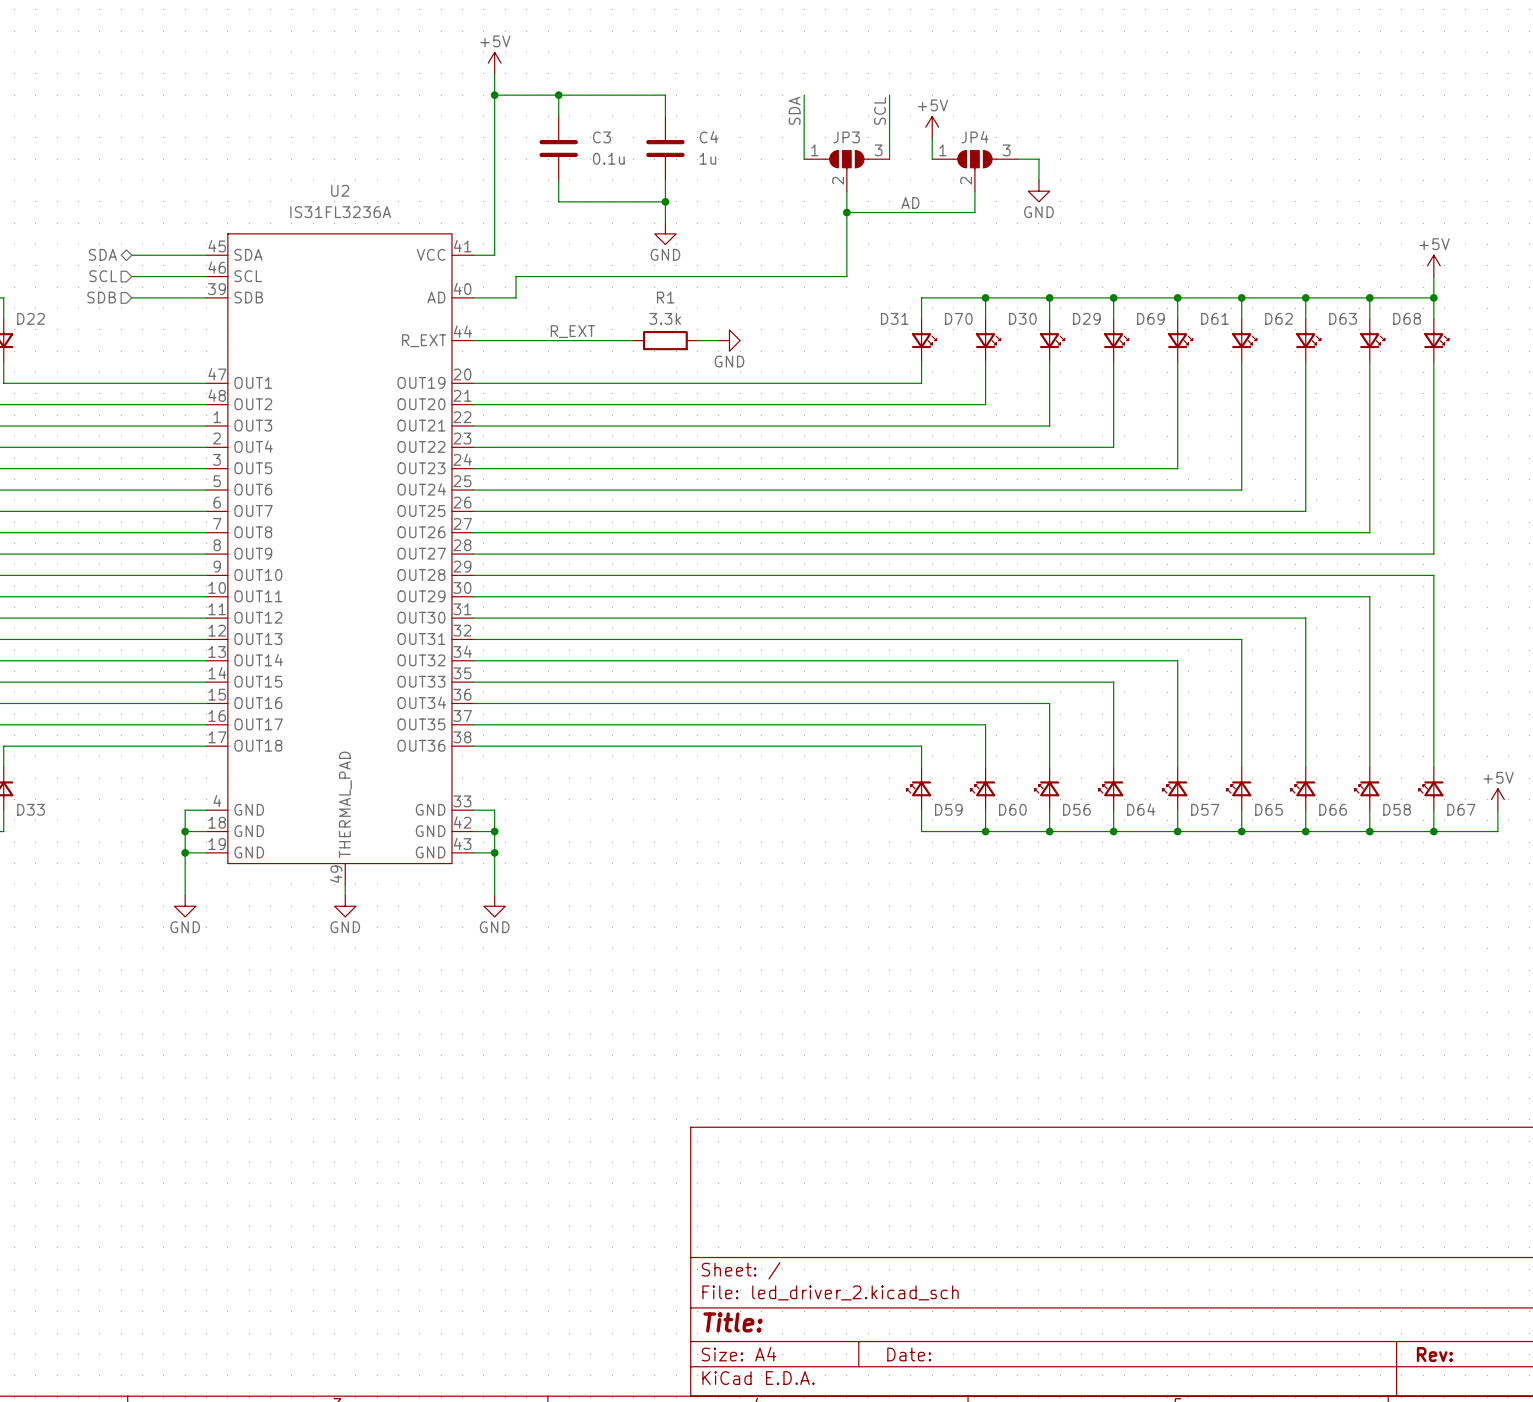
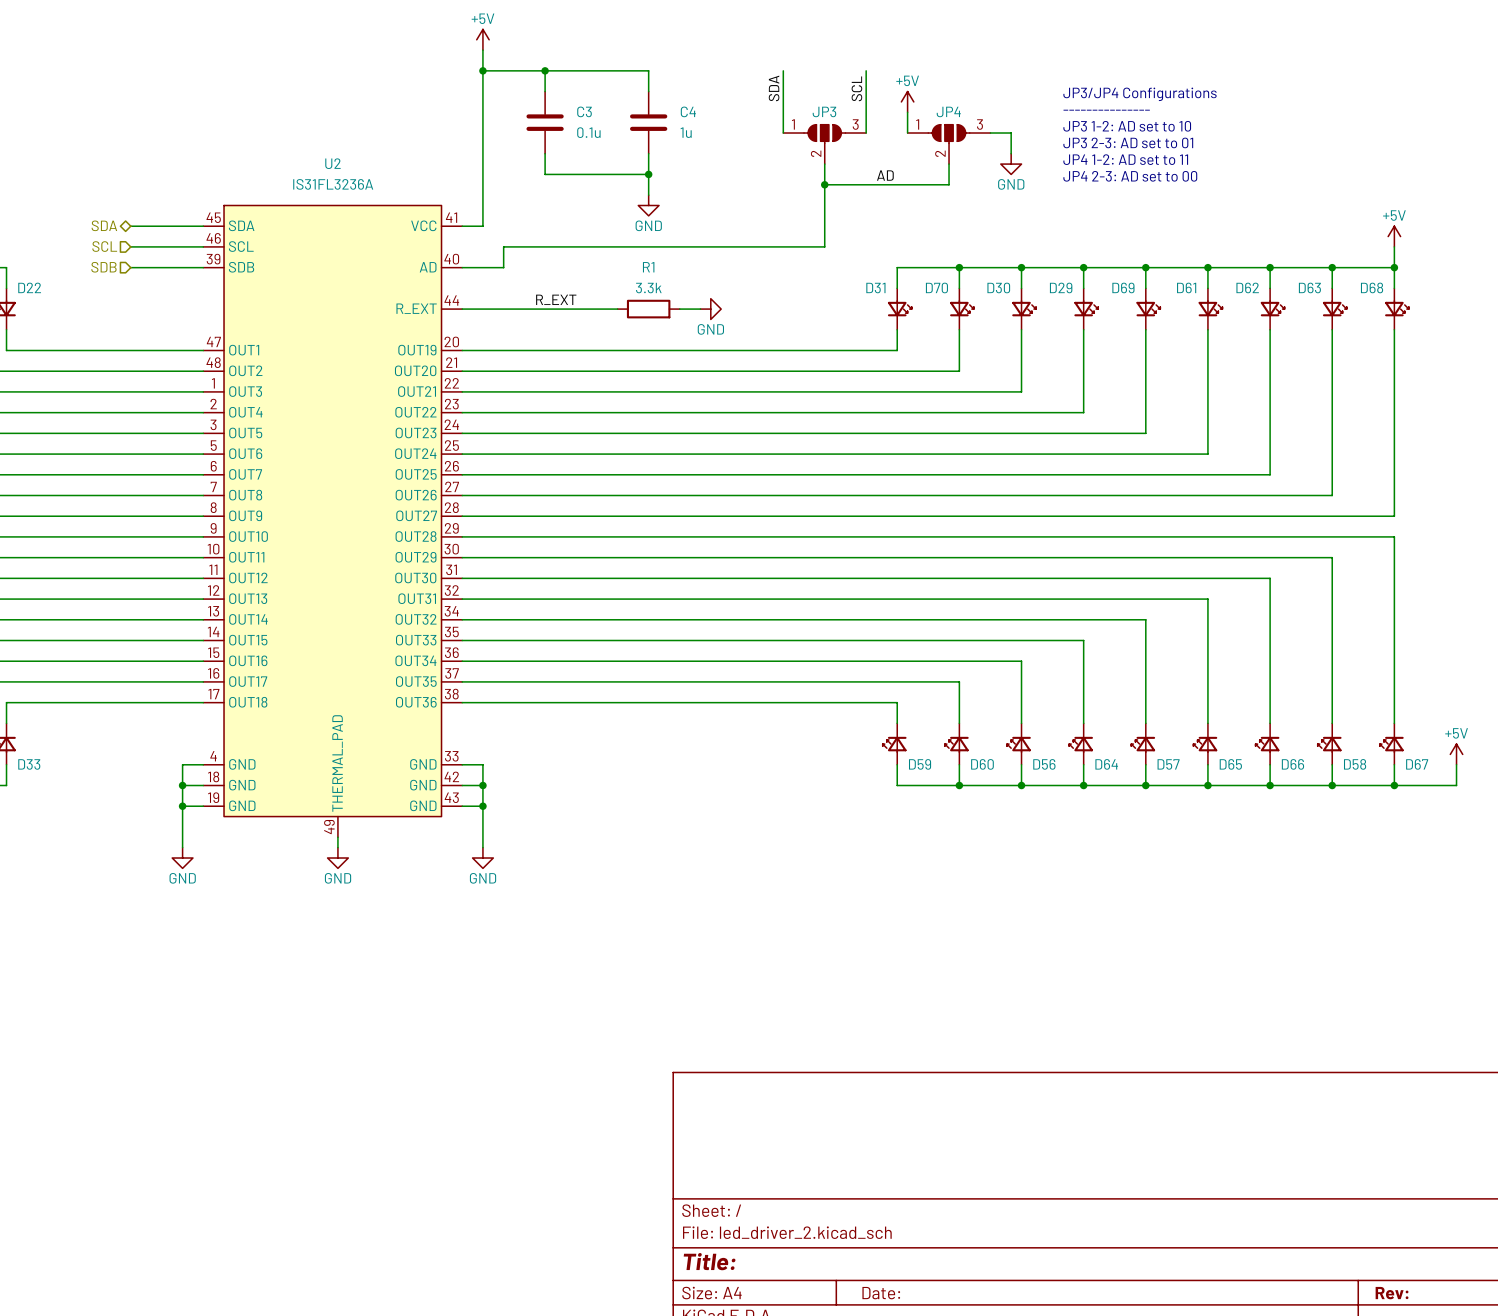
text: none -> JP3/JP4 Configurations (1140, 94)
text: none -> --------------- (1106, 110)
text: none -> JP3 1-2: AD set to 10 (1127, 126)
text: none -> JP3 2-3: AD set to 01 (1128, 142)
text: none -> JP4 1-2: AD set to 11 (1125, 159)
text: none -> JP4 2-3: AD set to 00 (1130, 176)

